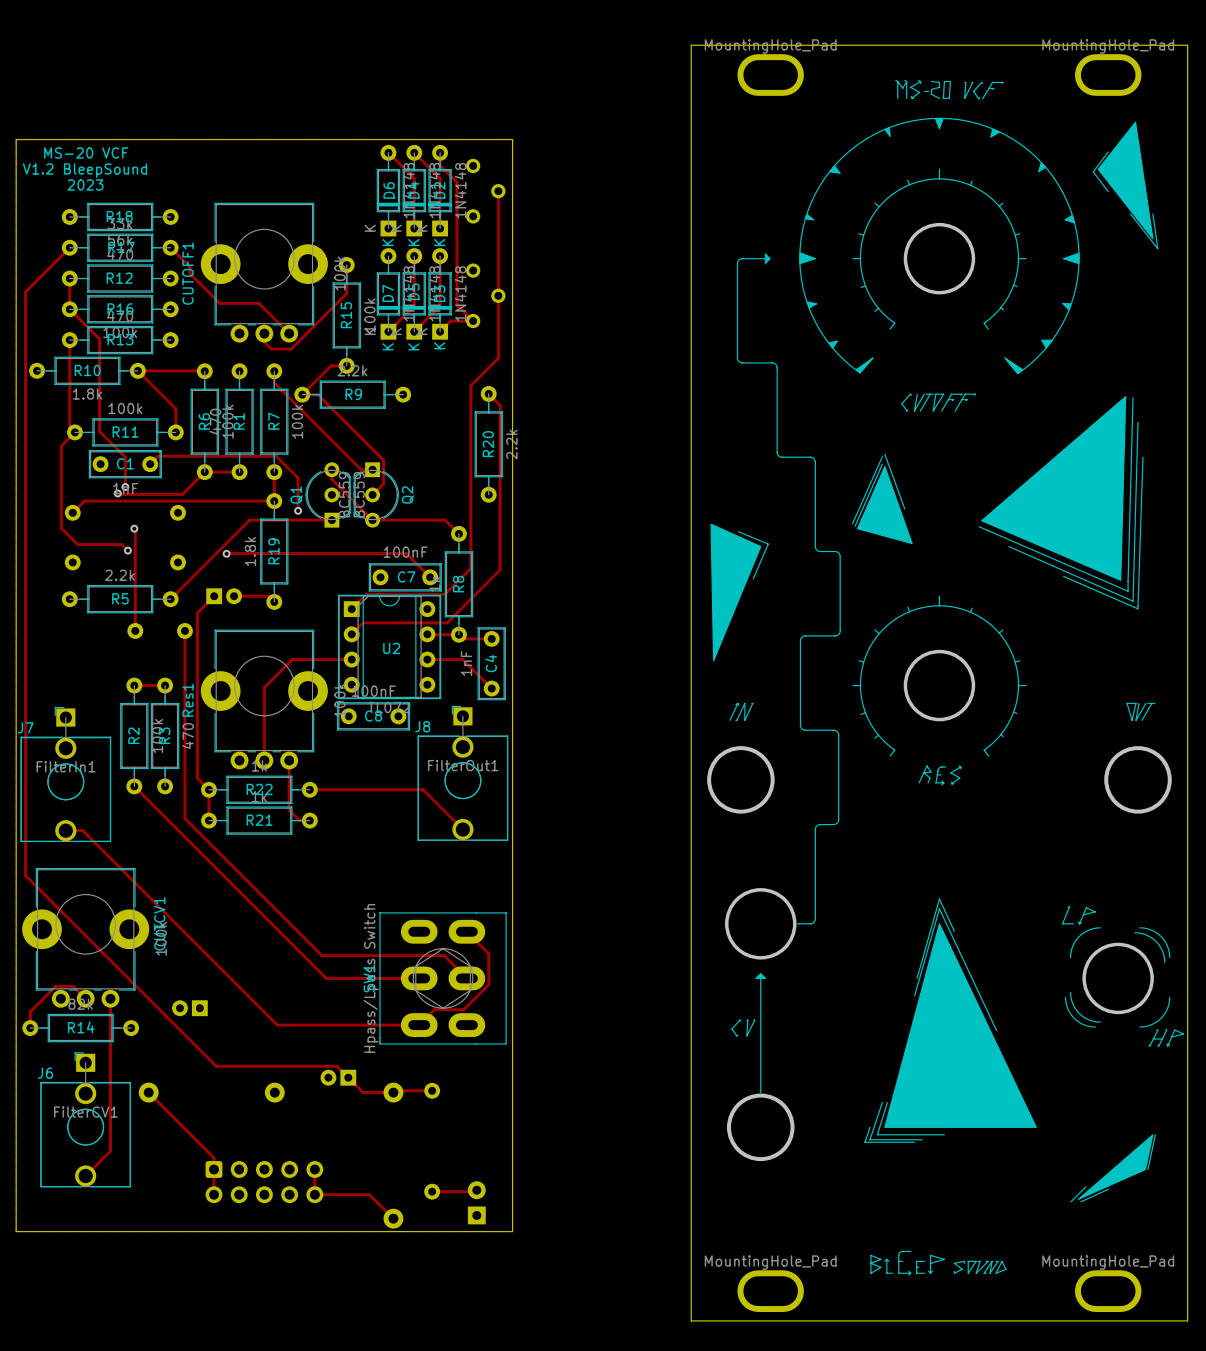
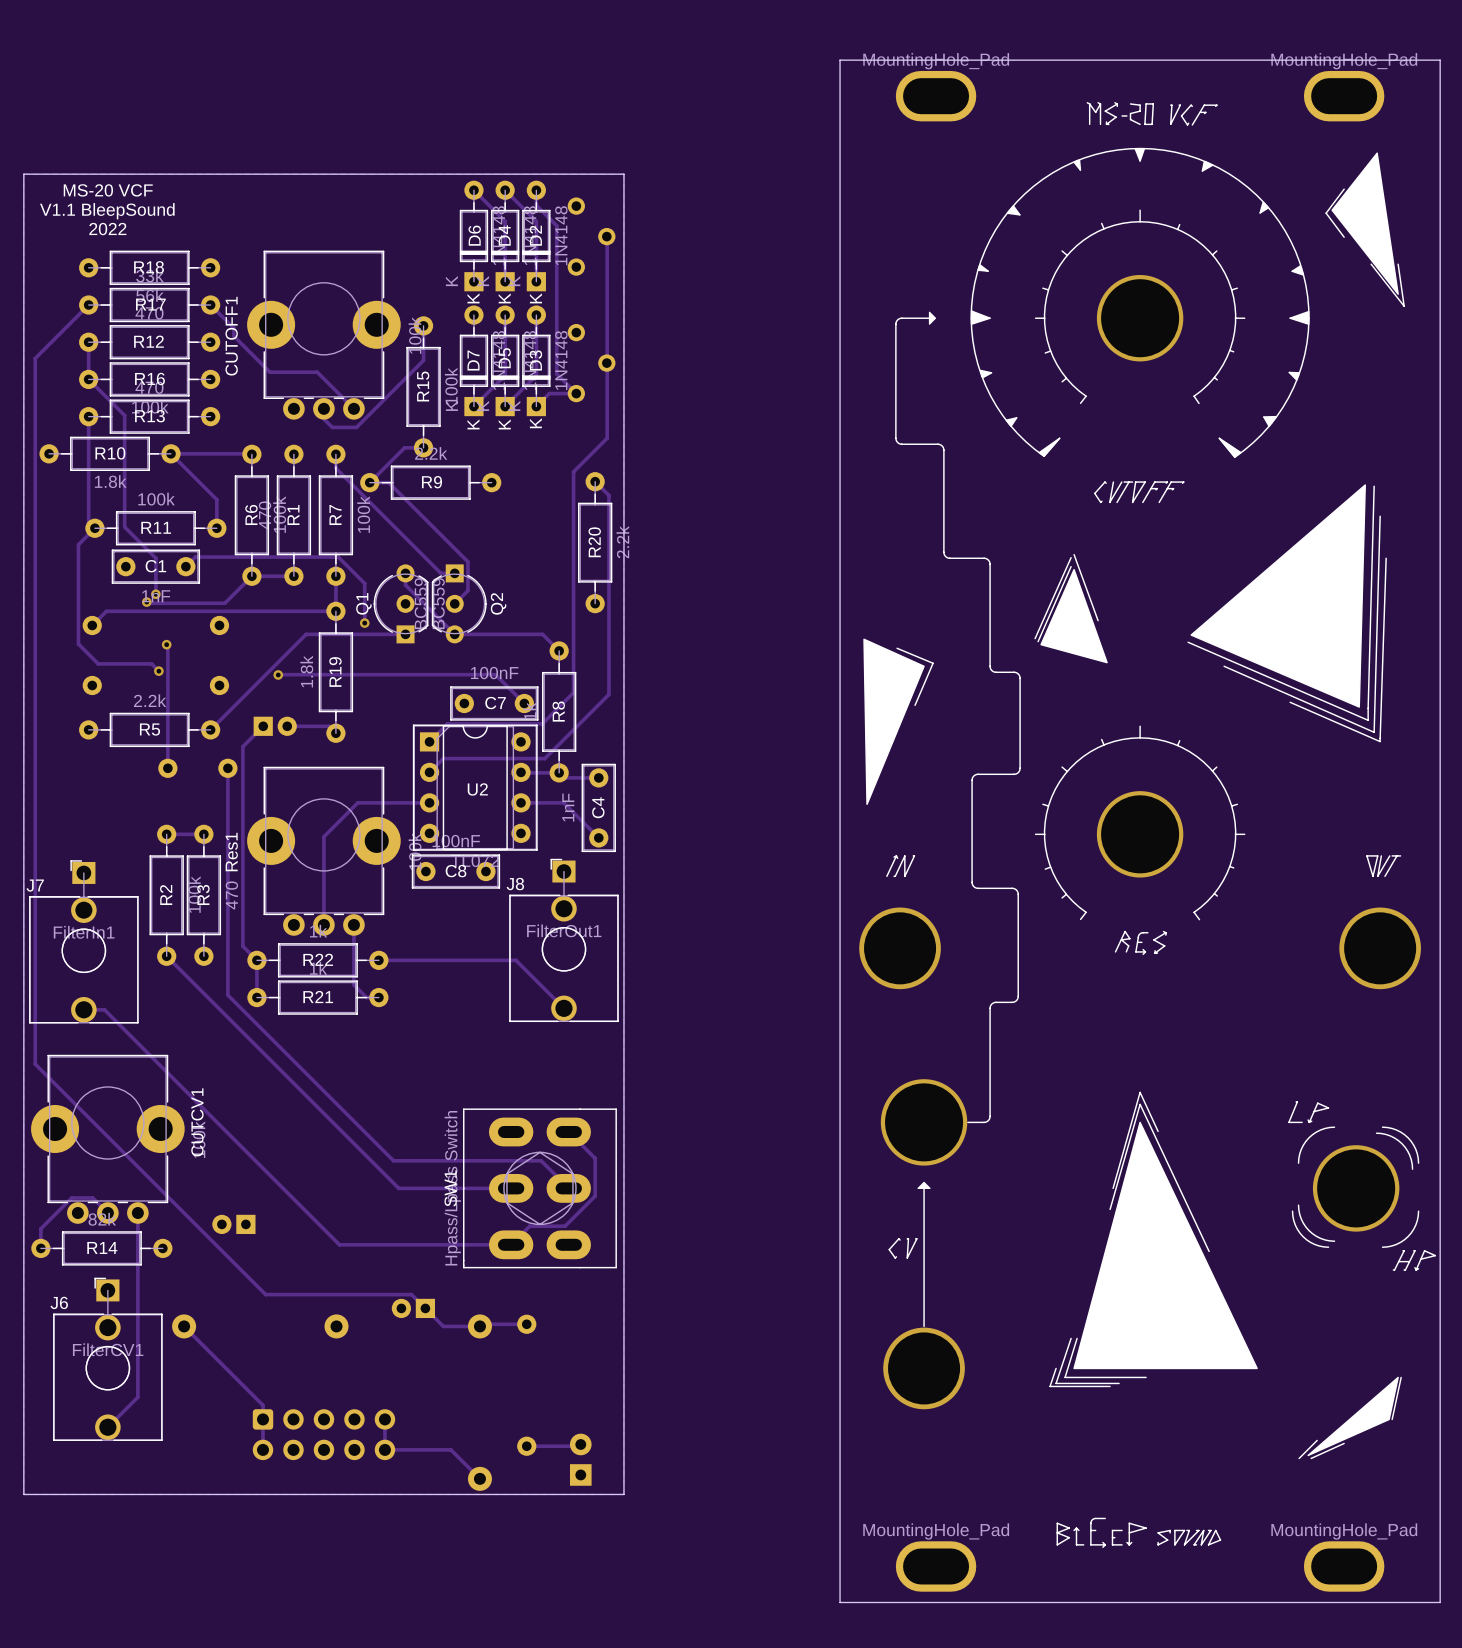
text: V1.2 BleepSound (84, 170) -> V1.1 BleepSound (107, 211)
text: 2023 (85, 184) -> 2022 (107, 229)

